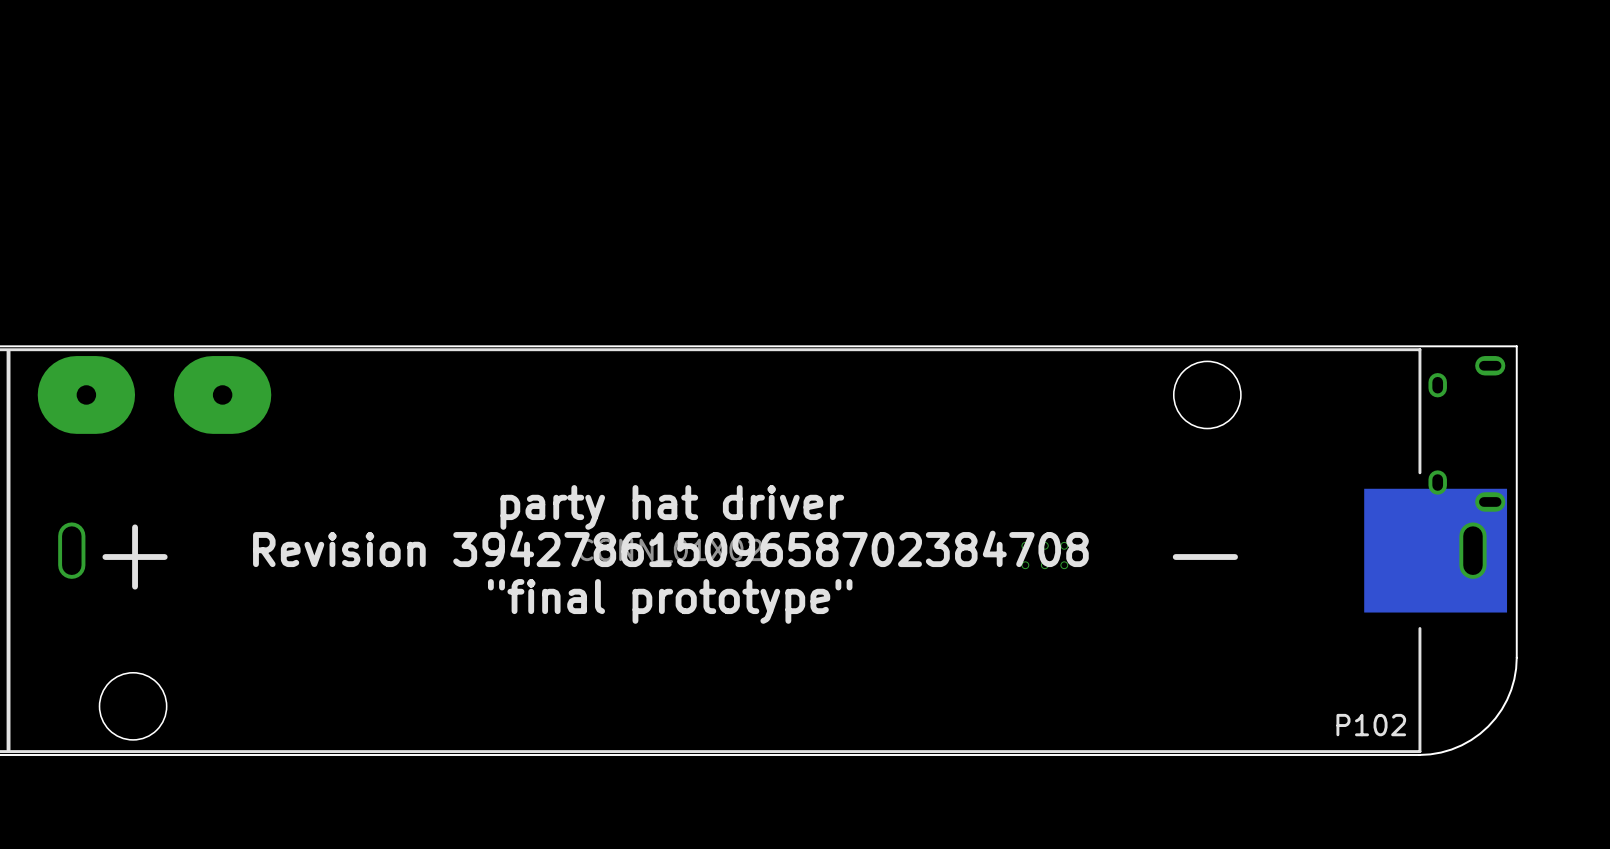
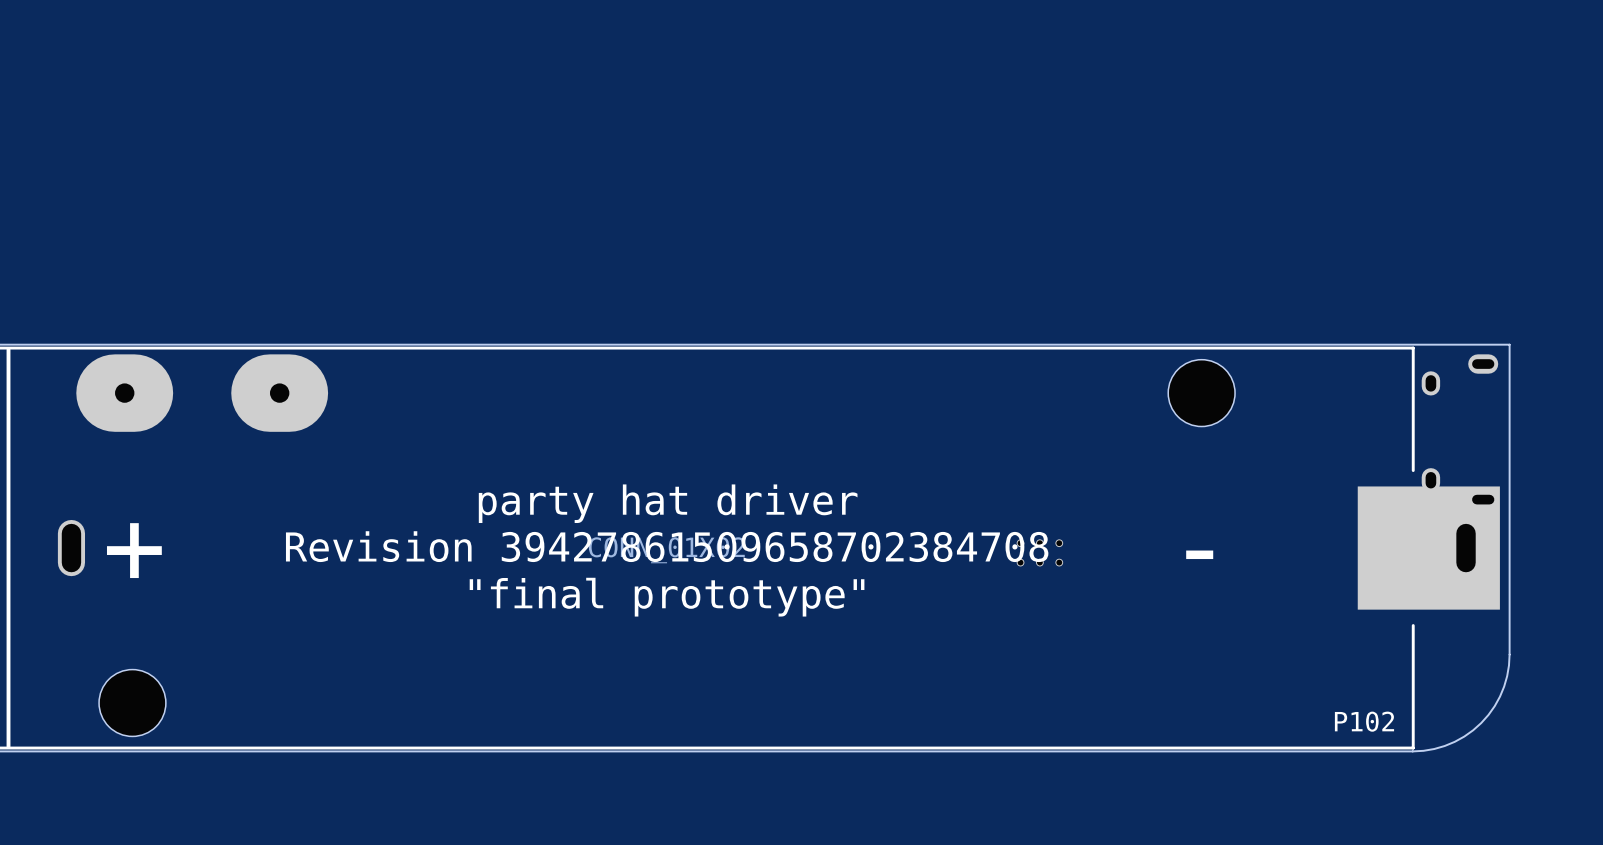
part position: (86, 394) -> (124, 393)
part: (222, 394) -> none
part: none -> (279, 393)

